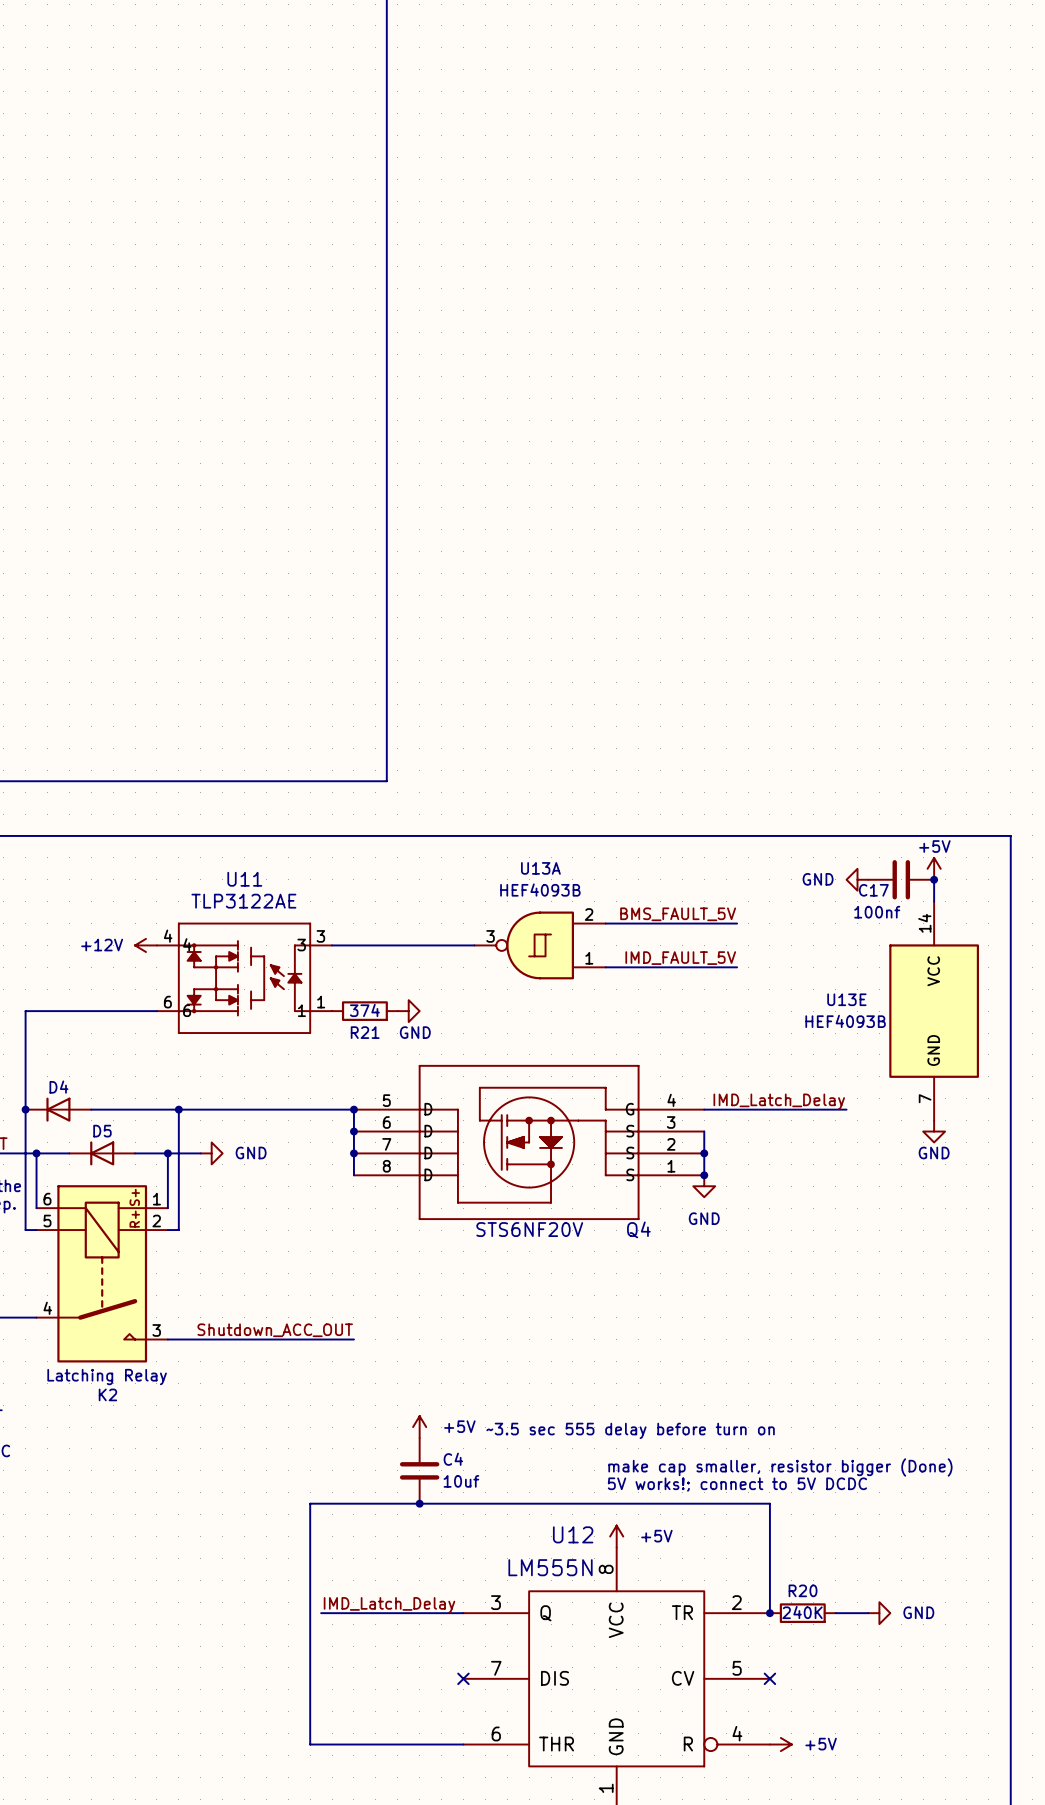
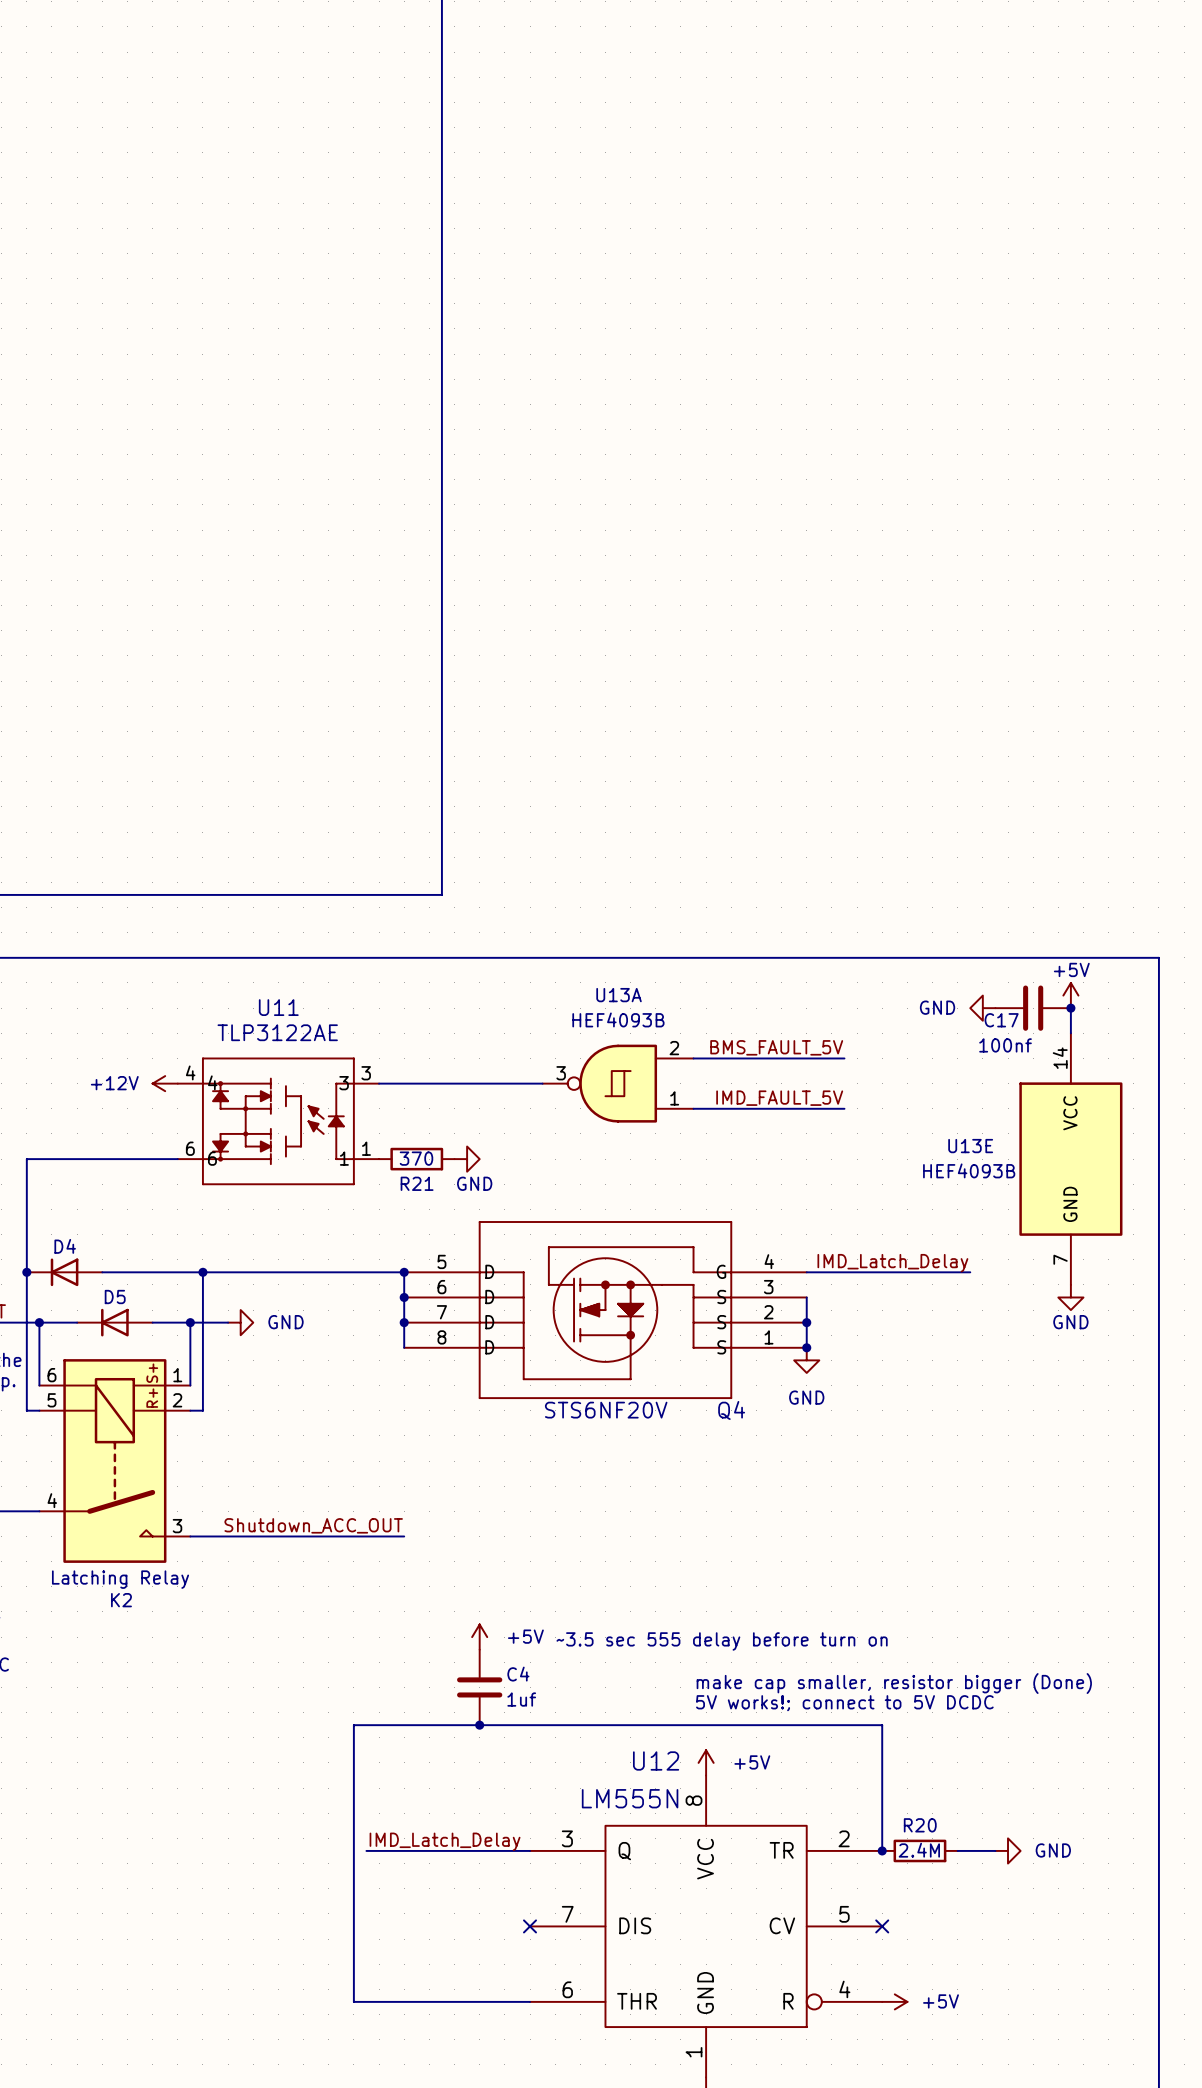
R21 value: 374 (364, 1010) -> 370 (416, 1158)
C4 value: 10uf (461, 1481) -> 1uf (521, 1699)
R20 value: 240K (802, 1612) -> 2.4M (919, 1850)

